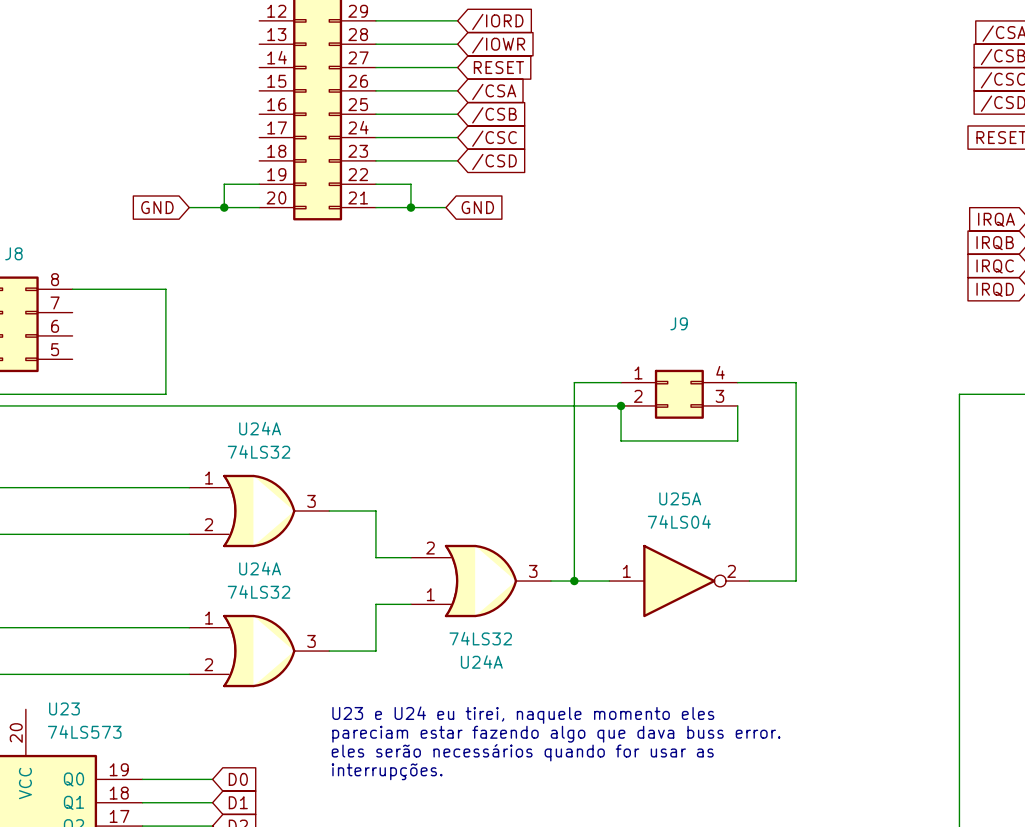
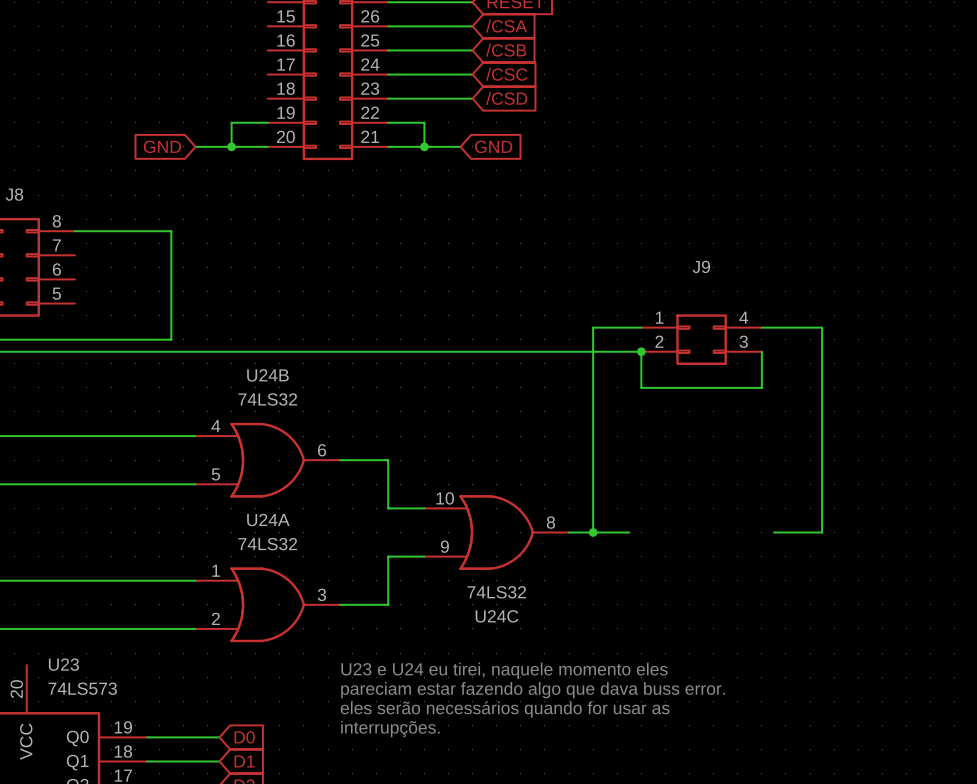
U24A name: U24A (260, 428) -> U24B (267, 375)
U24A pin number: 1 (209, 478) -> 4 (215, 426)
U24A pin number: 3 (311, 501) -> 6 (322, 450)
U24A pin number: 2 (208, 524) -> 5 (215, 474)
U24A pin number: 2 (430, 548) -> 10 (445, 498)
U24A pin number: 3 (533, 571) -> 8 (550, 522)
U25A: 74LS04 (679, 581) -> none
U24A pin number: 1 (430, 594) -> 9 (444, 546)
U24A name: U24A (481, 661) -> U24C (497, 616)

